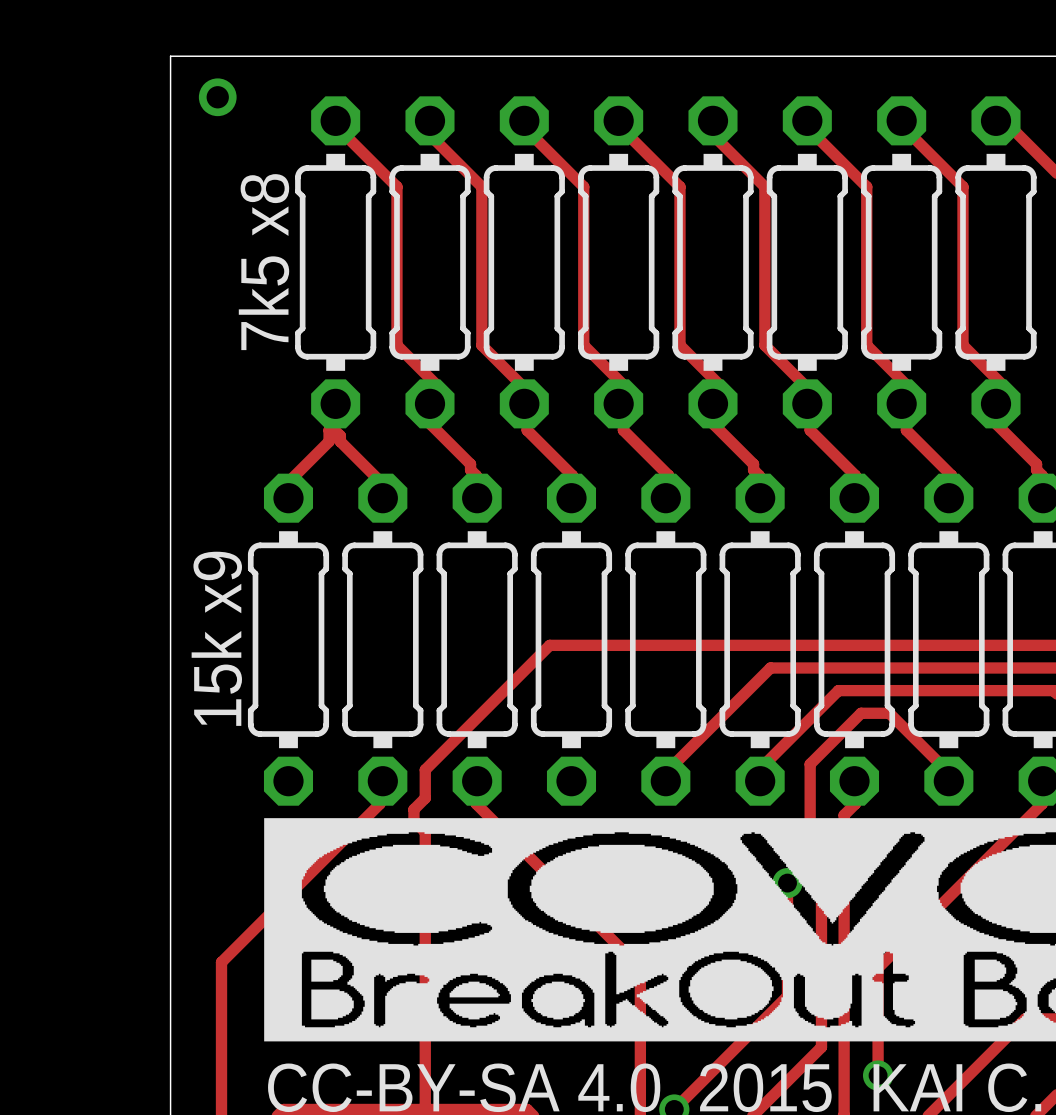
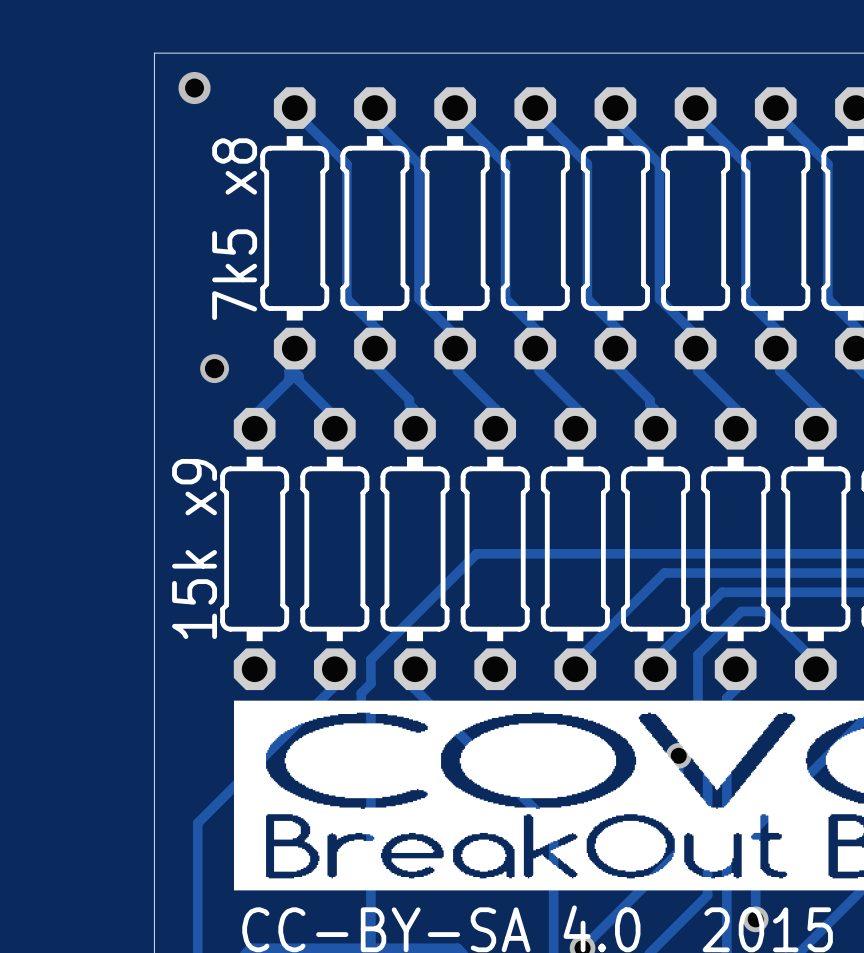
via: none -> (214, 368)

